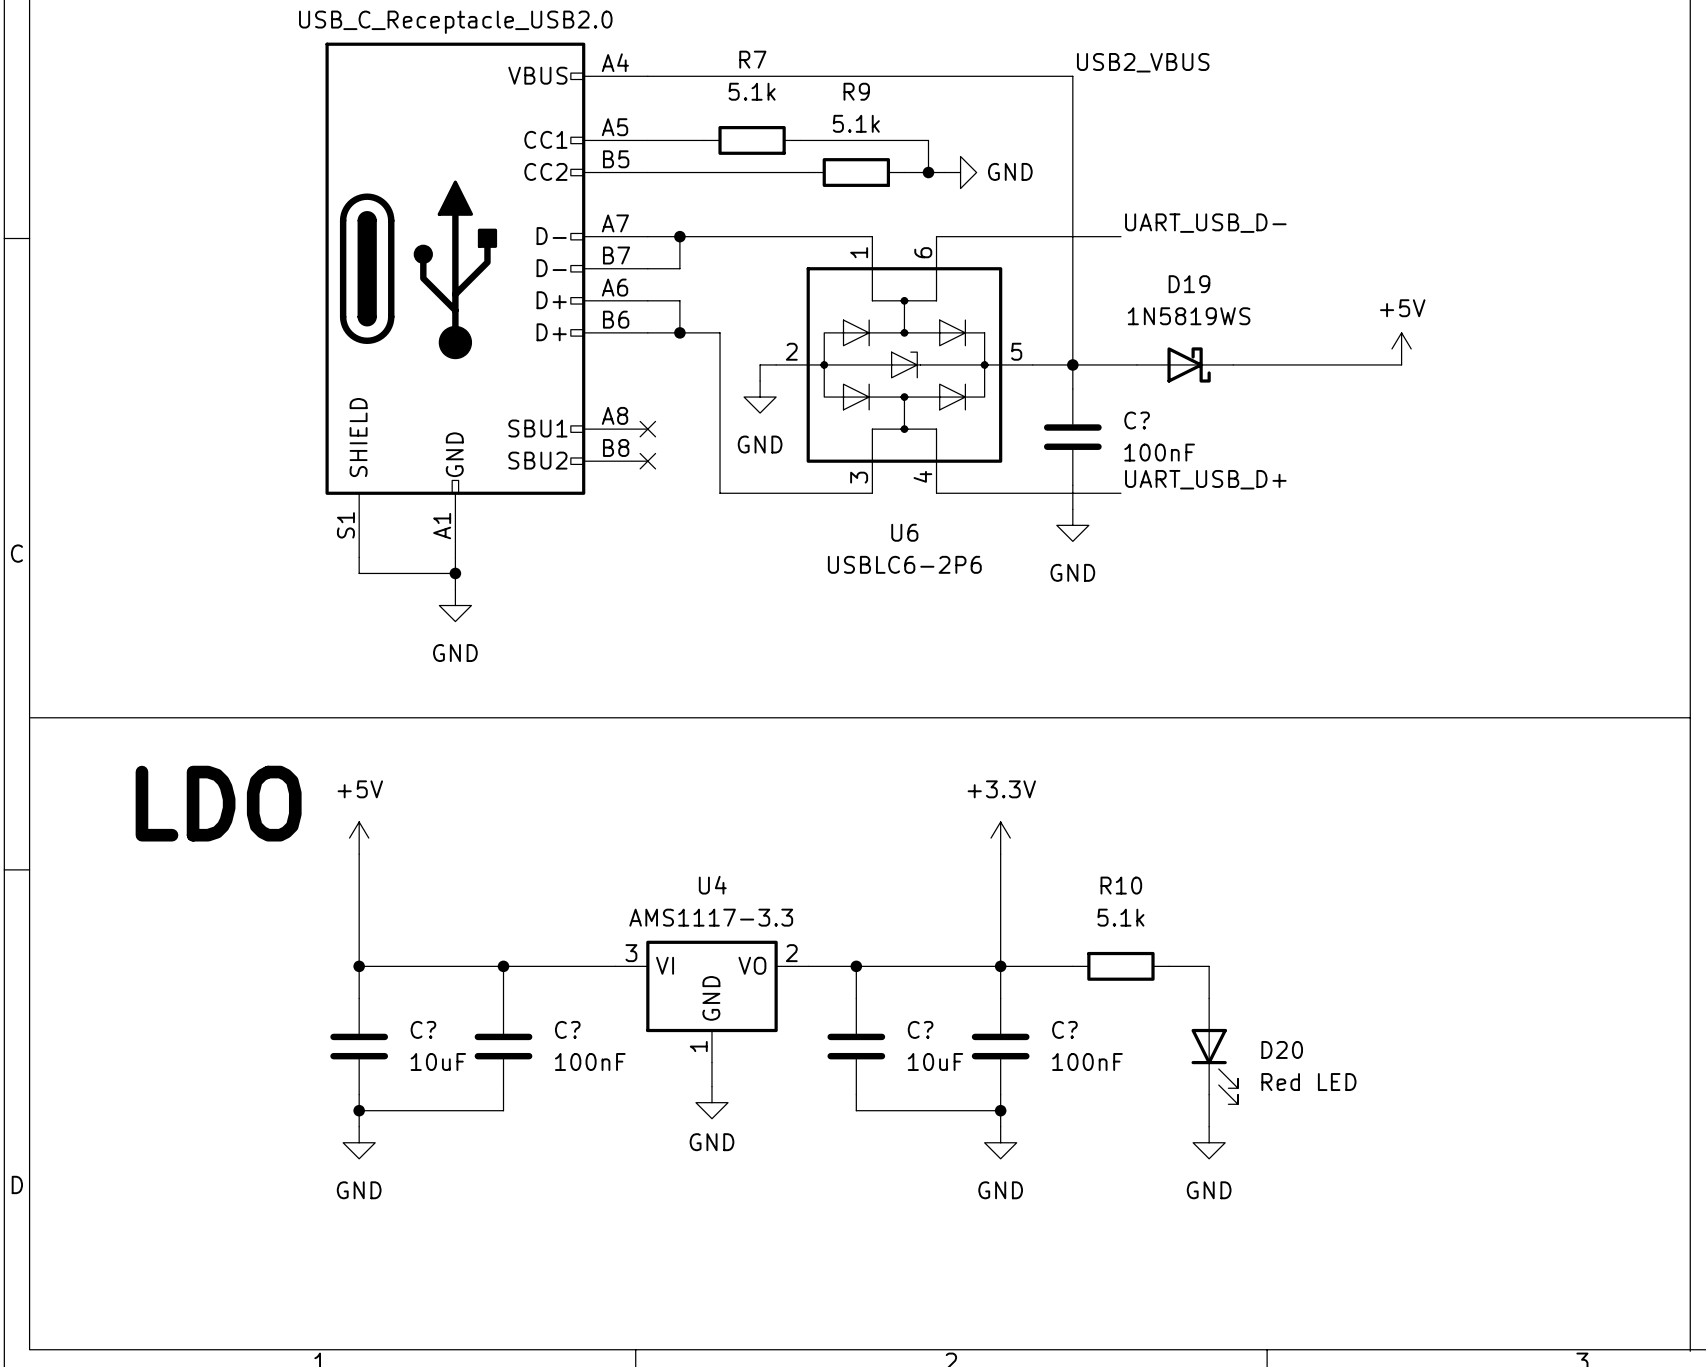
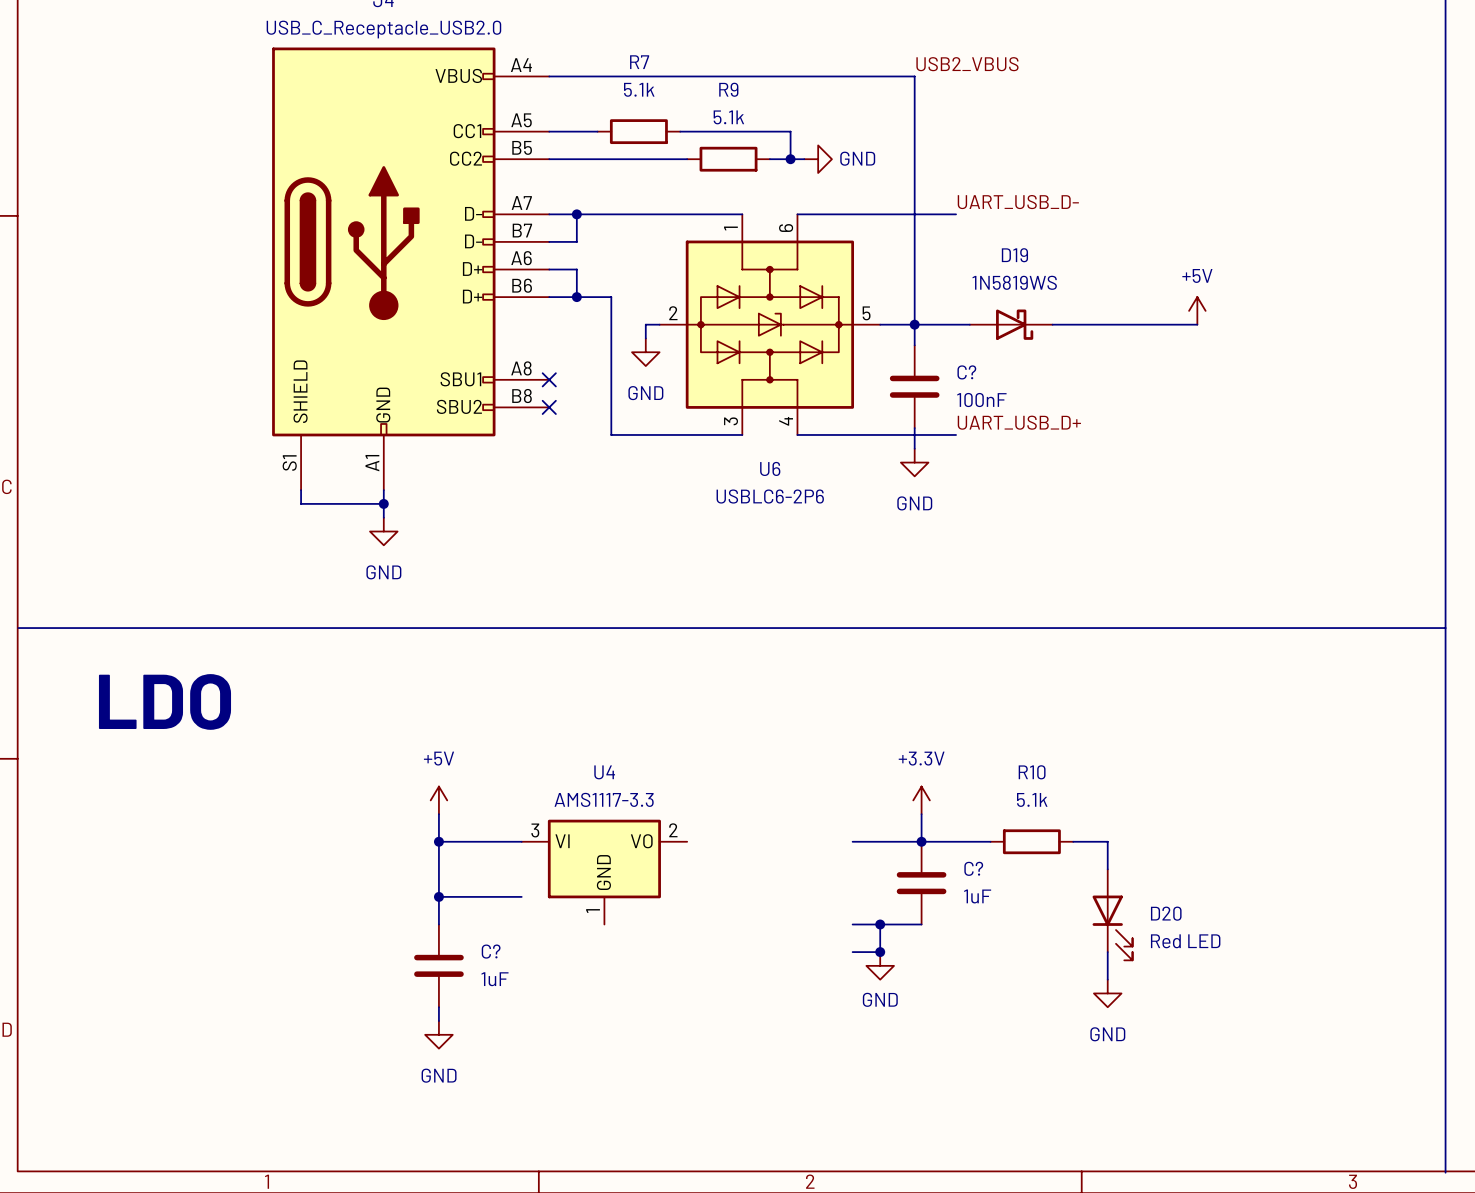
power symbol position: +5V (359, 838) -> +5V (438, 800)
power symbol position: +3.3V (1000, 838) -> +3.3V (921, 800)
wire: (359, 854) (359, 998) -> none
wire: (1000, 854) (1000, 998) -> none
wire: none -> (438, 814) (438, 924)
wire: (359, 966) (519, 966) -> none
junction: (359, 966) -> none
wire: (503, 966) (503, 998) -> none
junction position: (503, 966) -> (438, 841)
wire: (808, 966) (1000, 966) -> none
wire: (856, 966) (856, 998) -> (921, 814) (921, 841)
junction: (856, 966) -> none
junction: (1000, 966) -> none
wire: none -> (914, 841) (990, 841)
junction: none -> (921, 841)
R10 position: (1120, 966) -> (1031, 841)
wire: (1169, 966) (1209, 966) (1209, 998) -> (1073, 841) (1107, 841) (1107, 869)
C?: none -> 1uF (921, 883)
wire: none -> (438, 896) (521, 896)
junction: none -> (438, 896)
C?: 10uF (359, 1046) -> none
C?: 100nF (503, 1046) -> none
C?: 10uF (856, 1046) -> none
C?: 100nF (1000, 1046) -> none
D20 position: (1214, 1051) -> (1112, 914)
wire: (711, 1062) (711, 1086) -> none
wire: none -> (852, 924) (921, 924)
junction: none -> (880, 924)
wire: (359, 1094) (359, 1126) -> none
wire: (503, 1094) (503, 1110) (359, 1110) -> none
wire: (856, 1094) (856, 1110) (1000, 1110) -> none
wire: (1000, 1094) (1000, 1126) -> (852, 952) (880, 952) (880, 924)
junction: none -> (880, 952)
wire: (1209, 1094) (1209, 1126) -> (1107, 952) (1107, 979)
power symbol: GND (711, 1102) -> none
junction: (359, 1110) -> none
C?: none -> 1uF (438, 965)
junction: (1000, 1110) -> none
power symbol: GND (359, 1142) -> none
power symbol position: GND (1000, 1142) -> GND (880, 965)
power symbol position: GND (1209, 1142) -> GND (1107, 993)
wire: none -> (438, 1007) (438, 1021)
power symbol: none -> GND (438, 1034)
power symbol text position: GND (1000, 1190) -> GND (880, 999)

